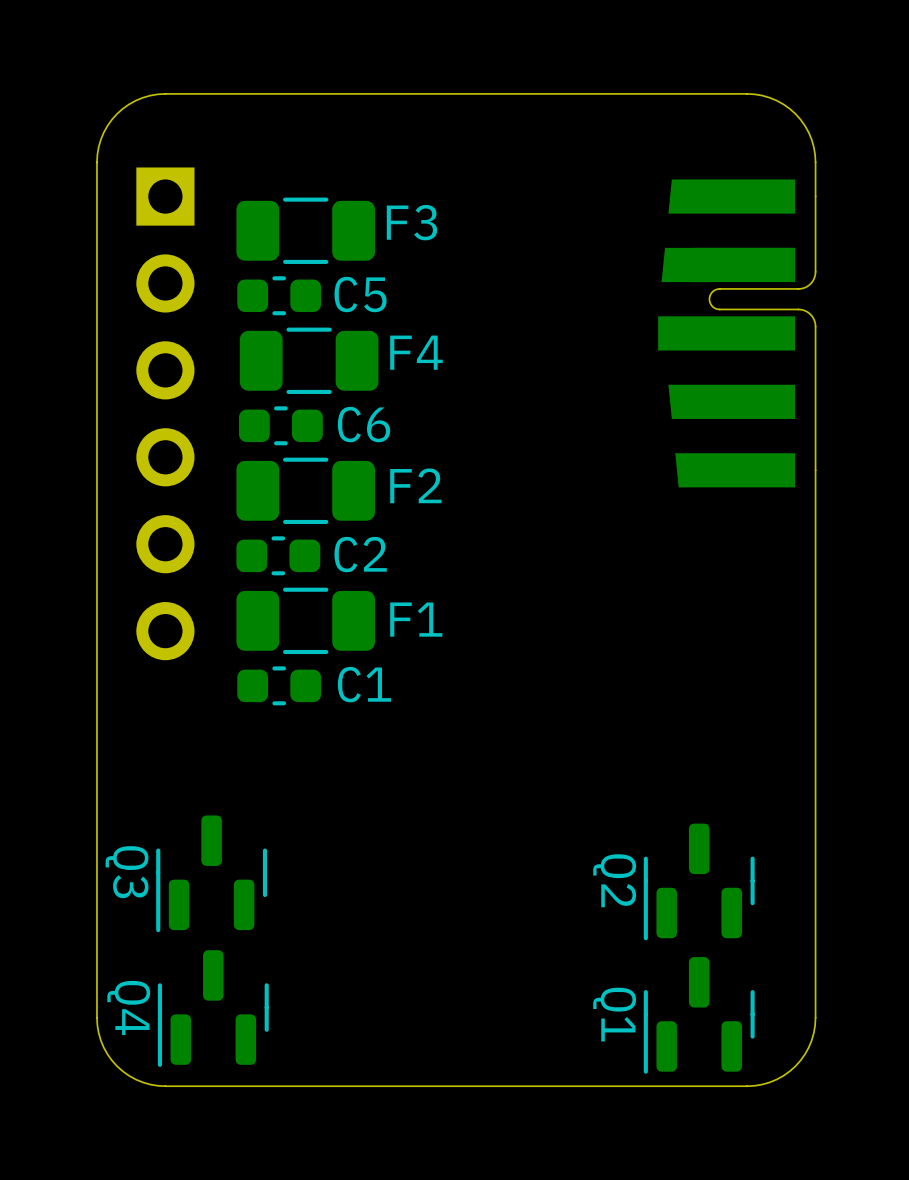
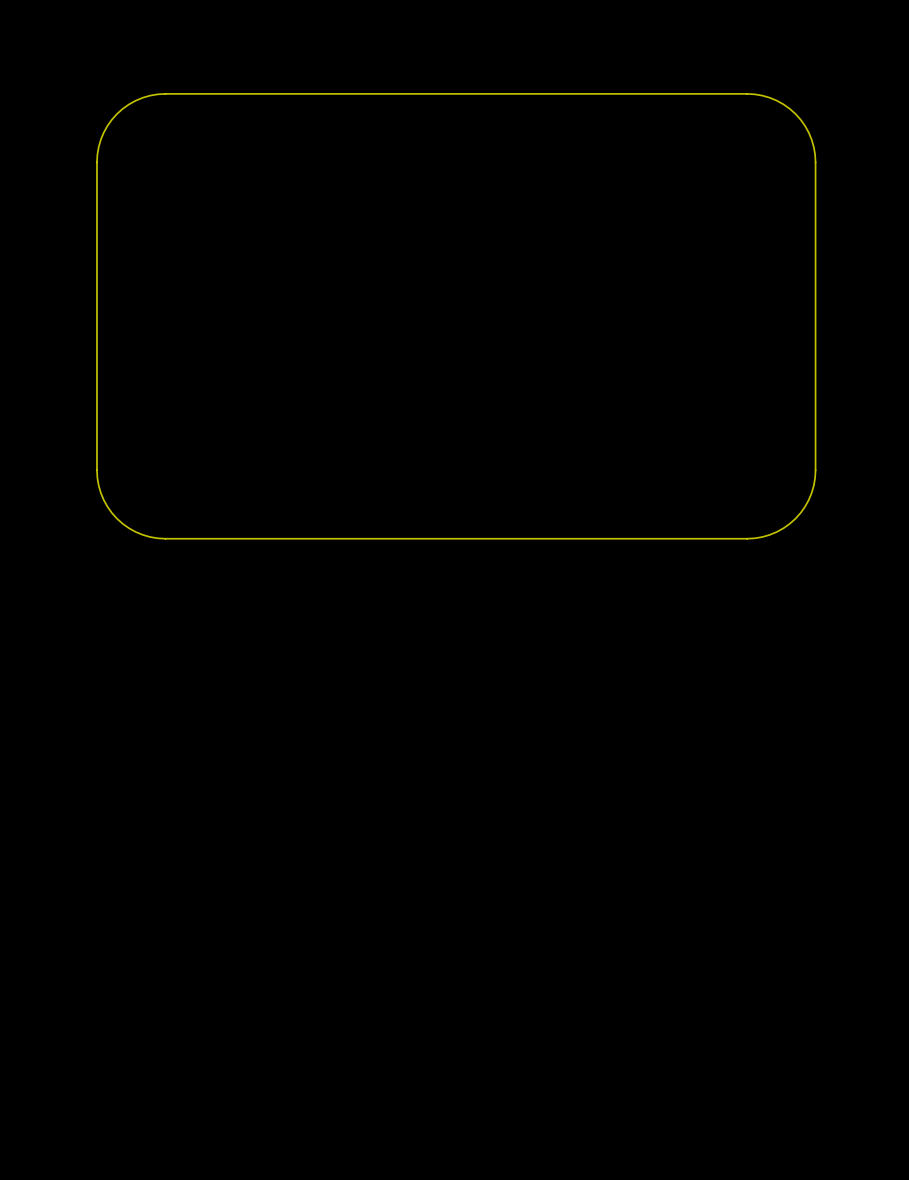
F3: (305, 230) -> none
C5: (279, 295) -> none
part: (737, 333) -> none
F4: (309, 360) -> none
part: (165, 413) -> none
C6: (280, 425) -> none
board edge: (815, 470) (815, 1025) (811, 1040) (805, 1054) (789, 1071) (769, 1082) (747, 1086) (165, 1086) (150, 1084) (135, 1079) (117, 1066) (103, 1047) (98, 1033) (96, 1017) (96, 470) -> (815, 196) (815, 477) (808, 499) (800, 512) (783, 528) (769, 534) (747, 538) (157, 538) (135, 531) (122, 523) (111, 512) (100, 492) (96, 470)
F2: (305, 490) -> none
C2: (278, 555) -> none
F1: (305, 620) -> none
C1: (279, 685) -> none
Q3: (211, 873) -> none
Q2: (699, 881) -> none
Q4: (213, 1008) -> none
Q1: (699, 1015) -> none

